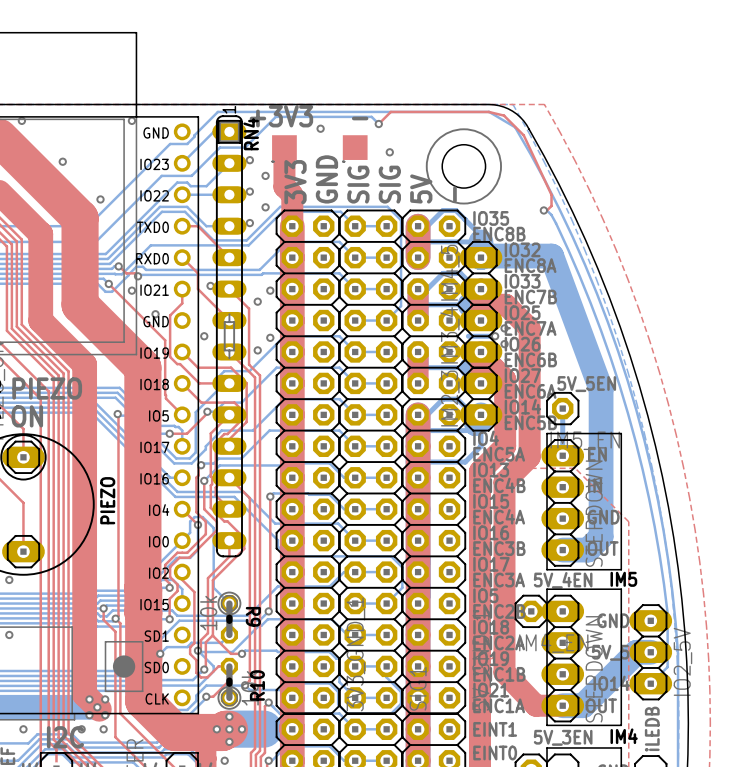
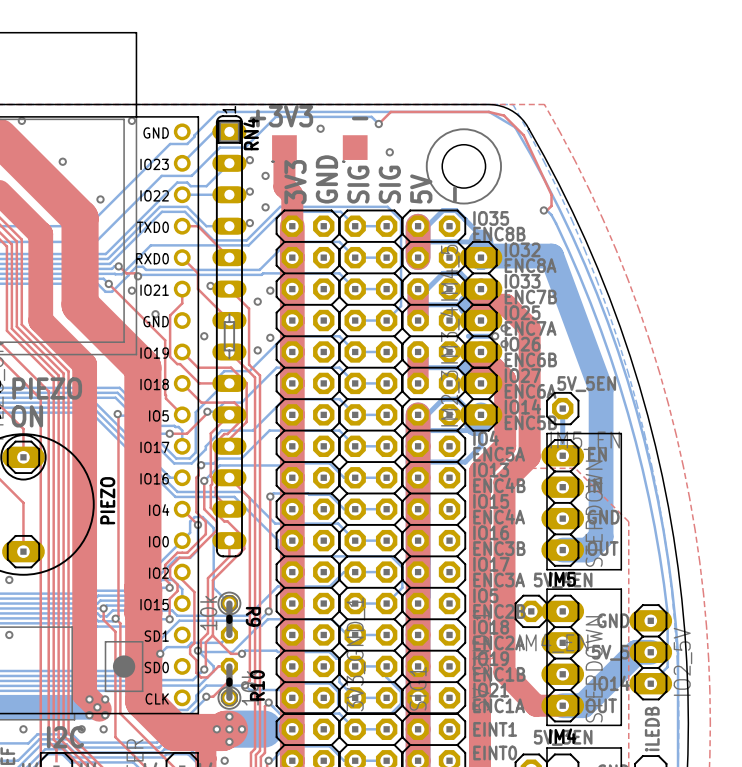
IM5 name position: IM5 (623, 579) -> IM5 (562, 579)
IM4 name position: IM4 (624, 736) -> IM4 (562, 736)

